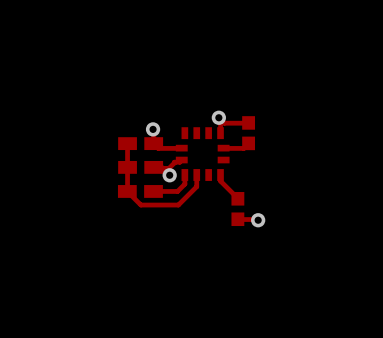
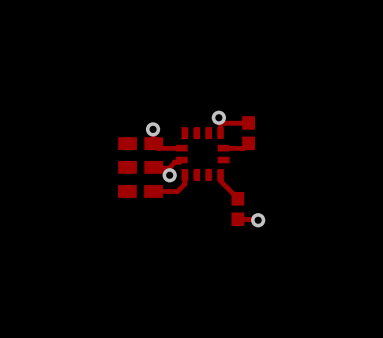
top track: (127, 143) (127, 191) -> none
top track: (196, 175) (196, 186) (178, 205) (140, 205) (127, 191) -> none

